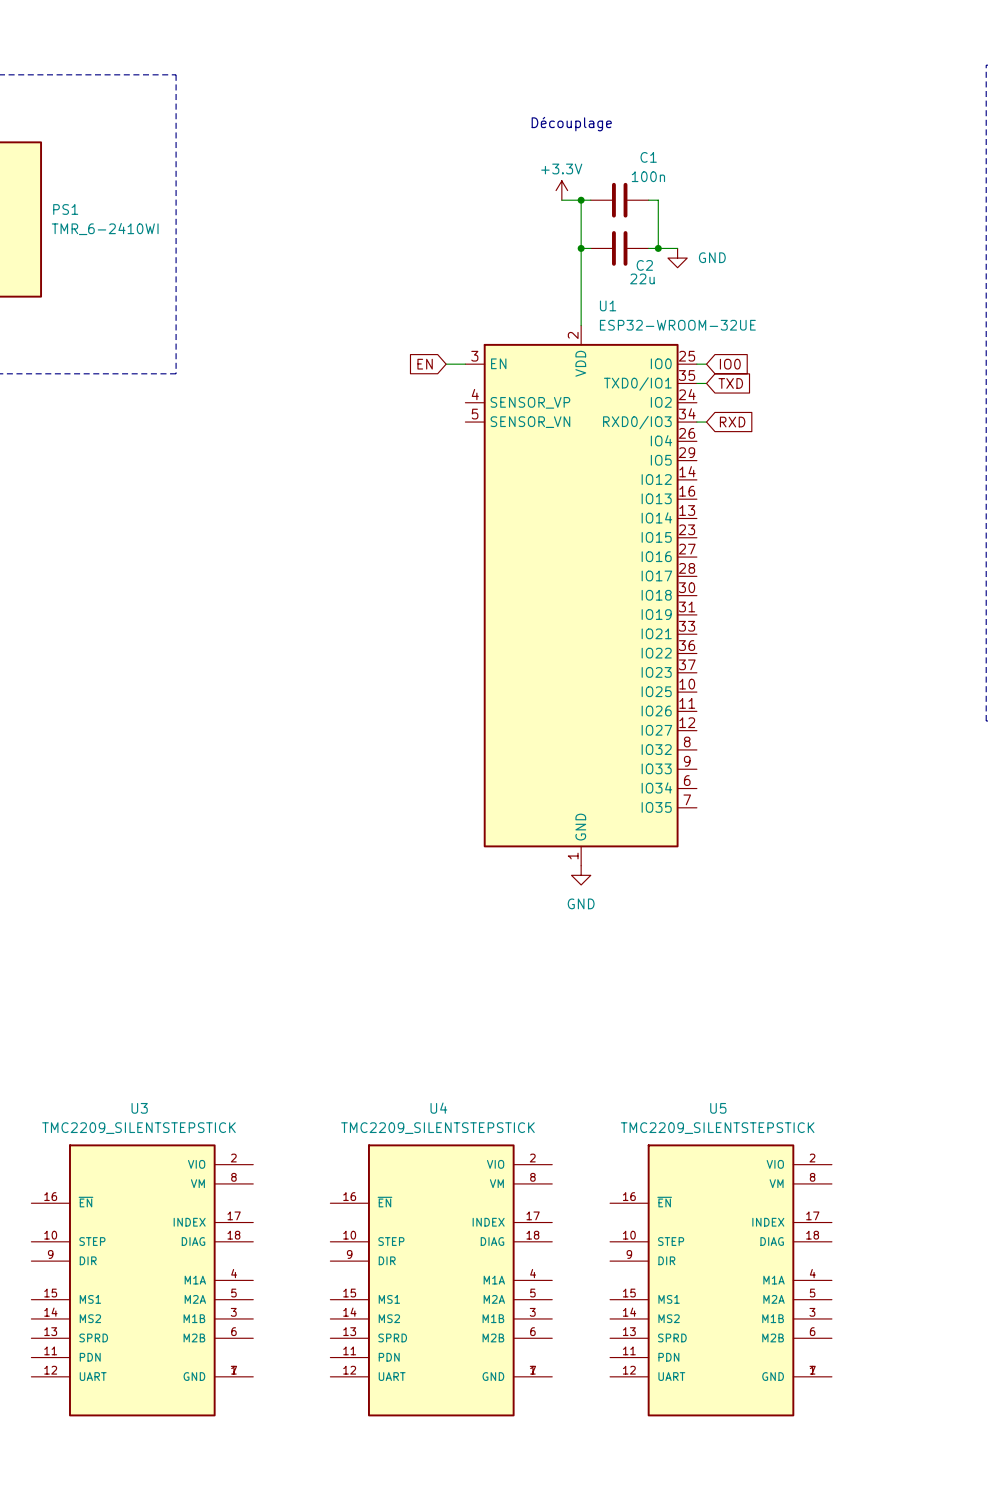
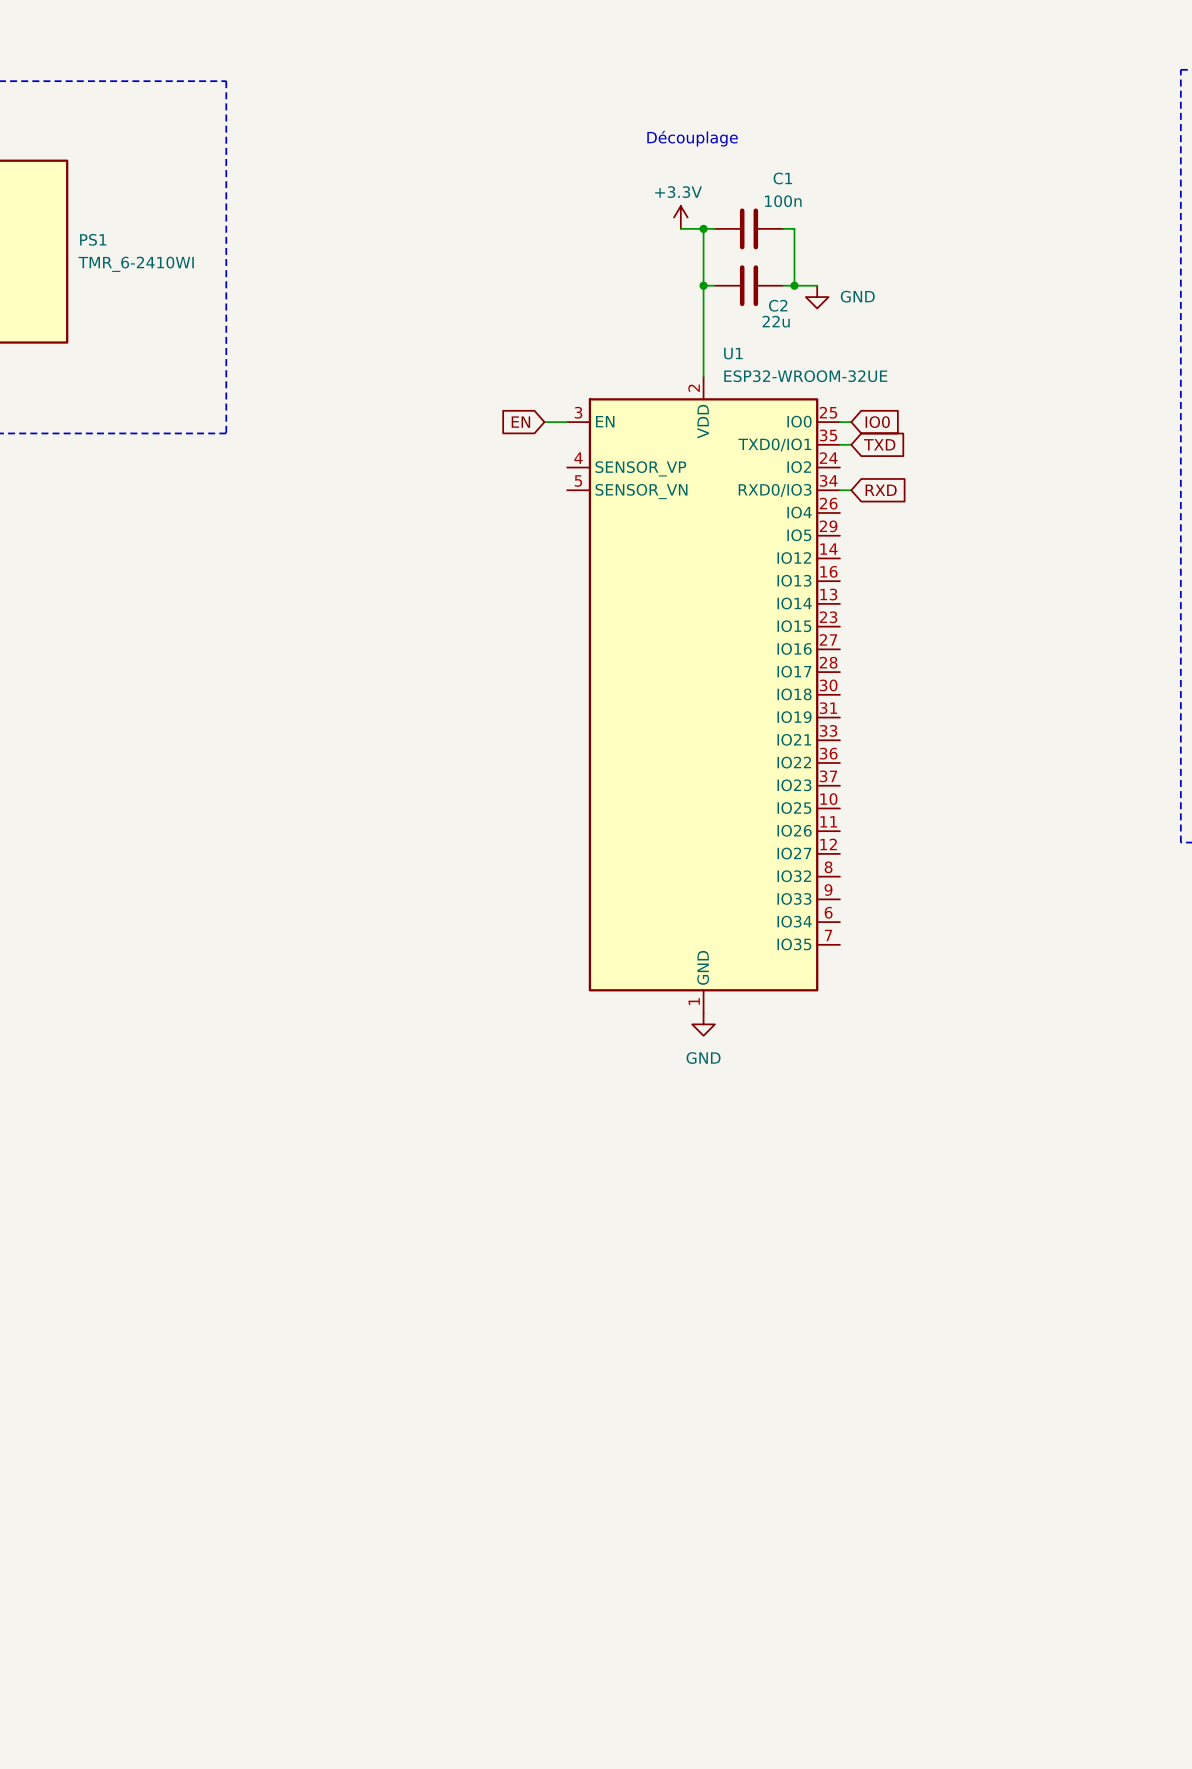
U3: TMC2209_SILENTSTEPSTICK (142, 1280) -> none
U4: TMC2209_SILENTSTEPSTICK (441, 1280) -> none
U5: TMC2209_SILENTSTEPSTICK (720, 1280) -> none

